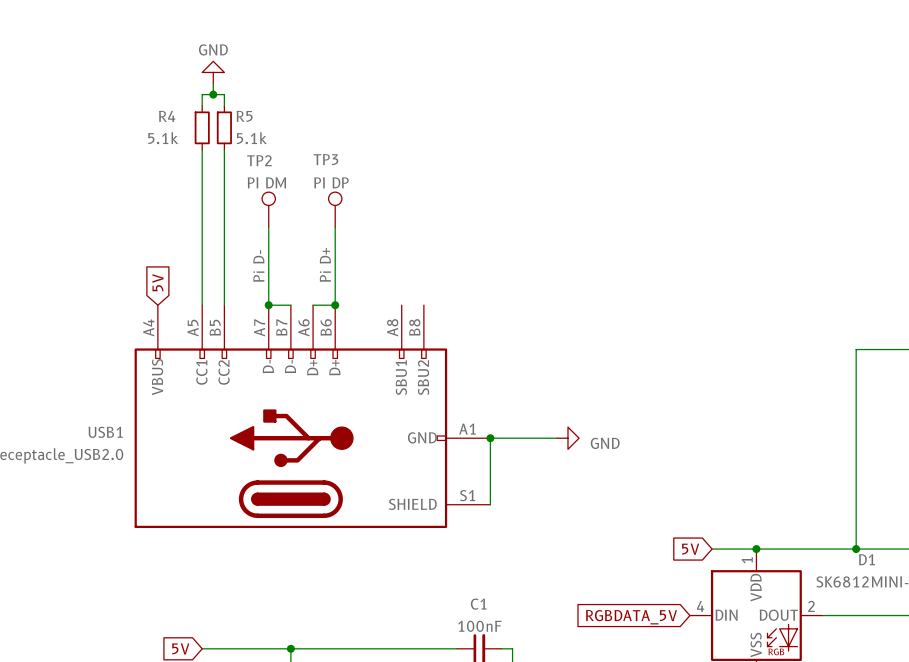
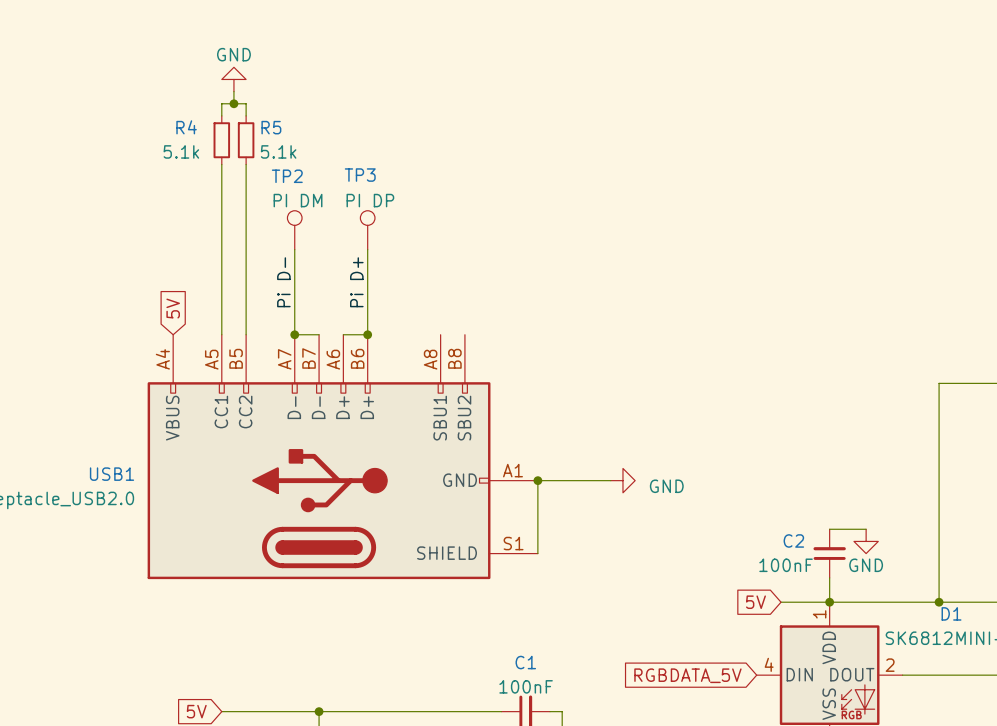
wire: none -> (829, 529) (866, 529)
power symbol: none -> GND (866, 541)
C2: none -> 100nF (829, 553)
wire: none -> (829, 577) (829, 602)

